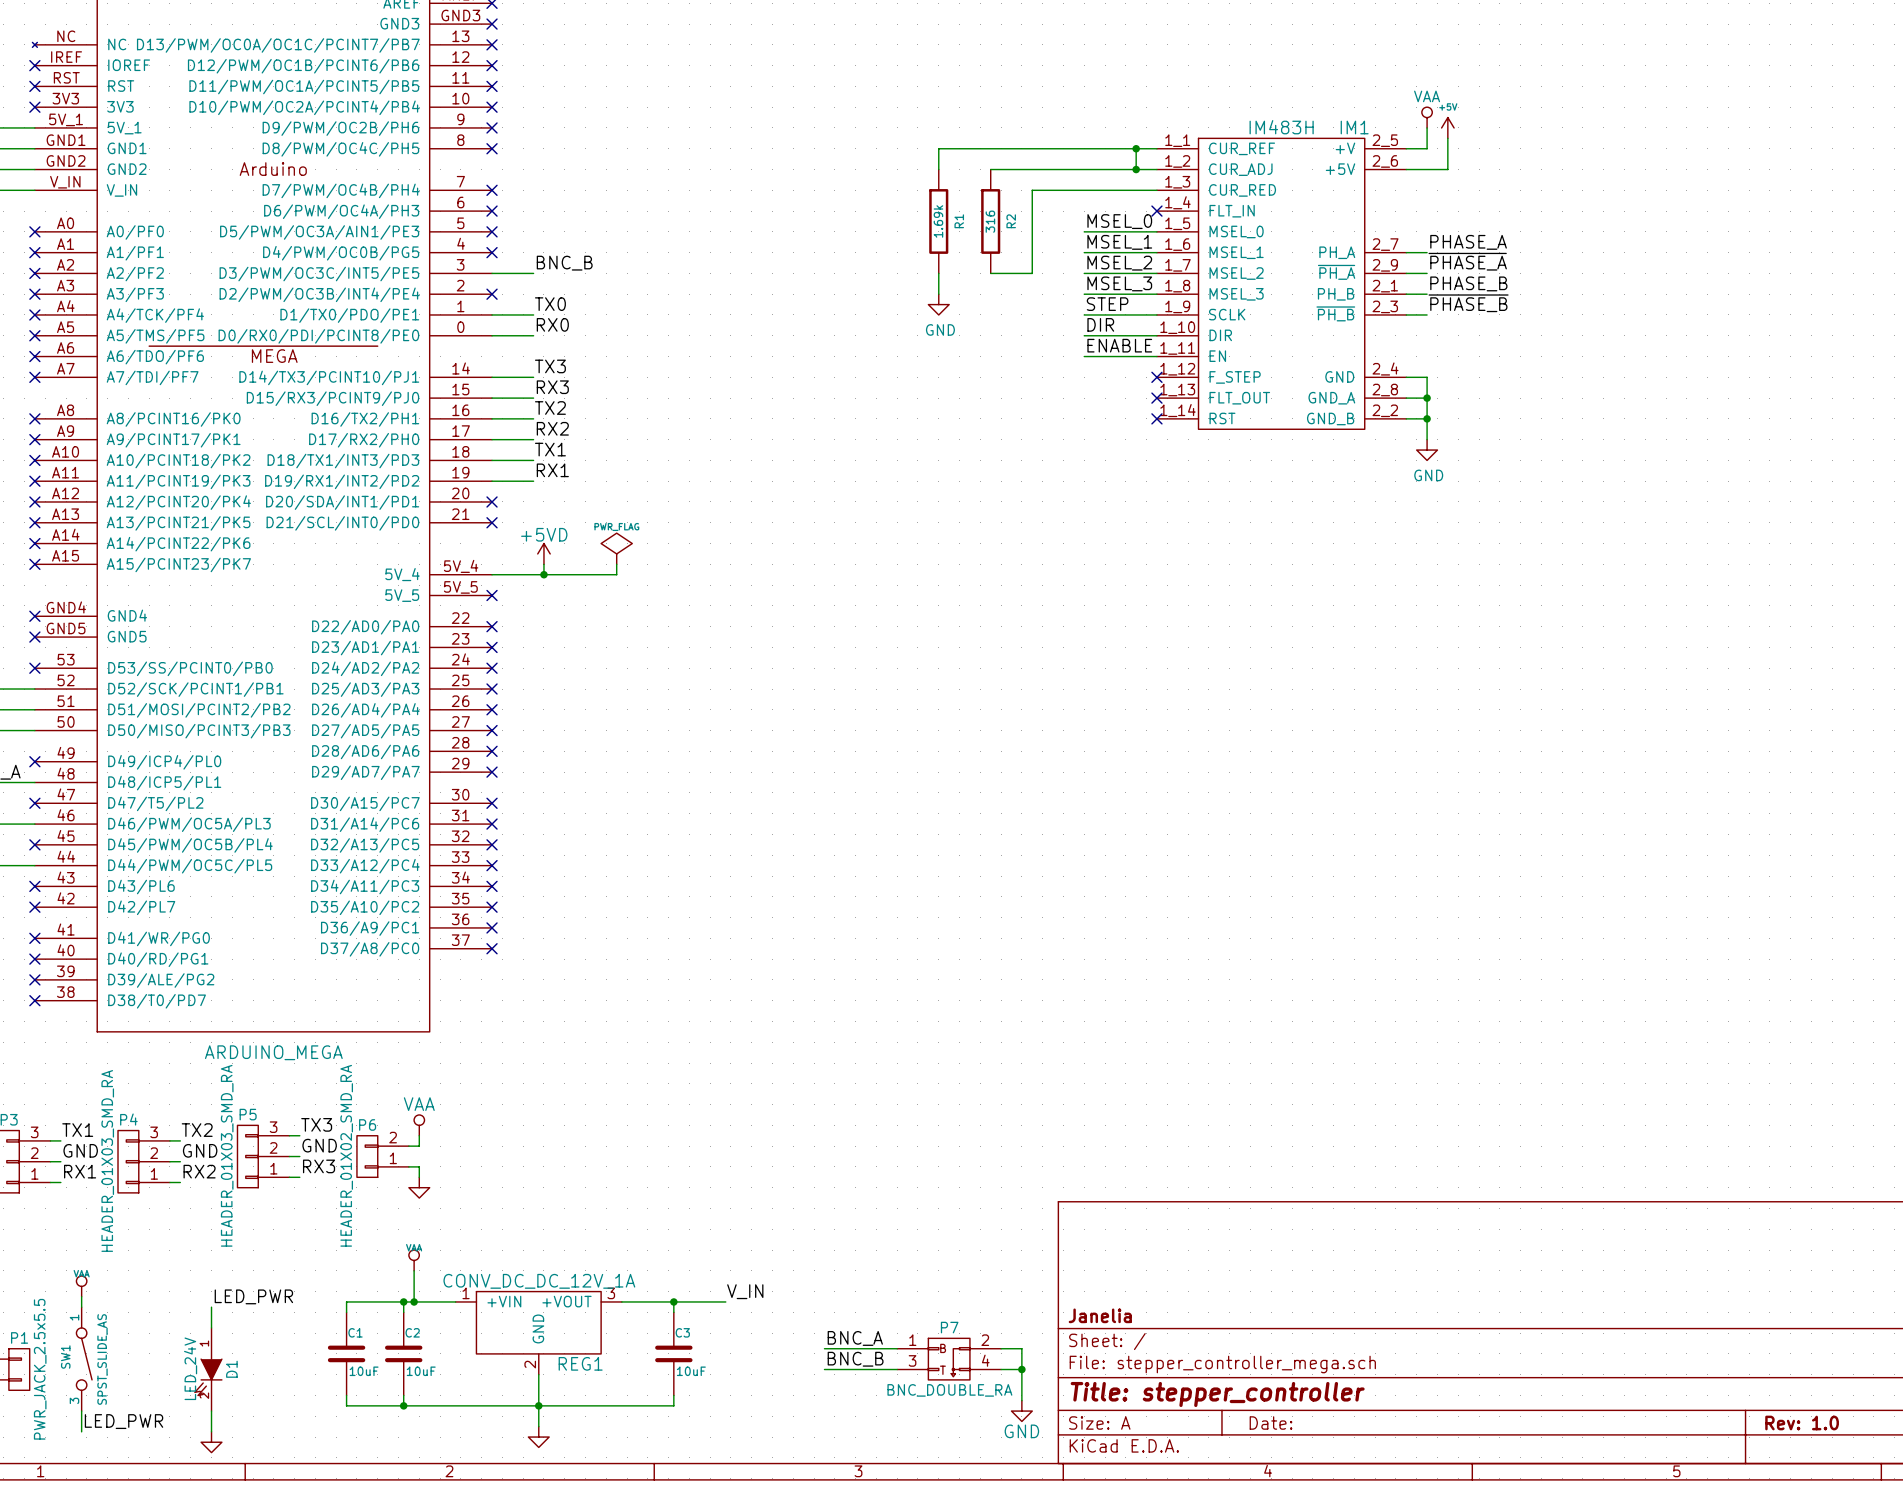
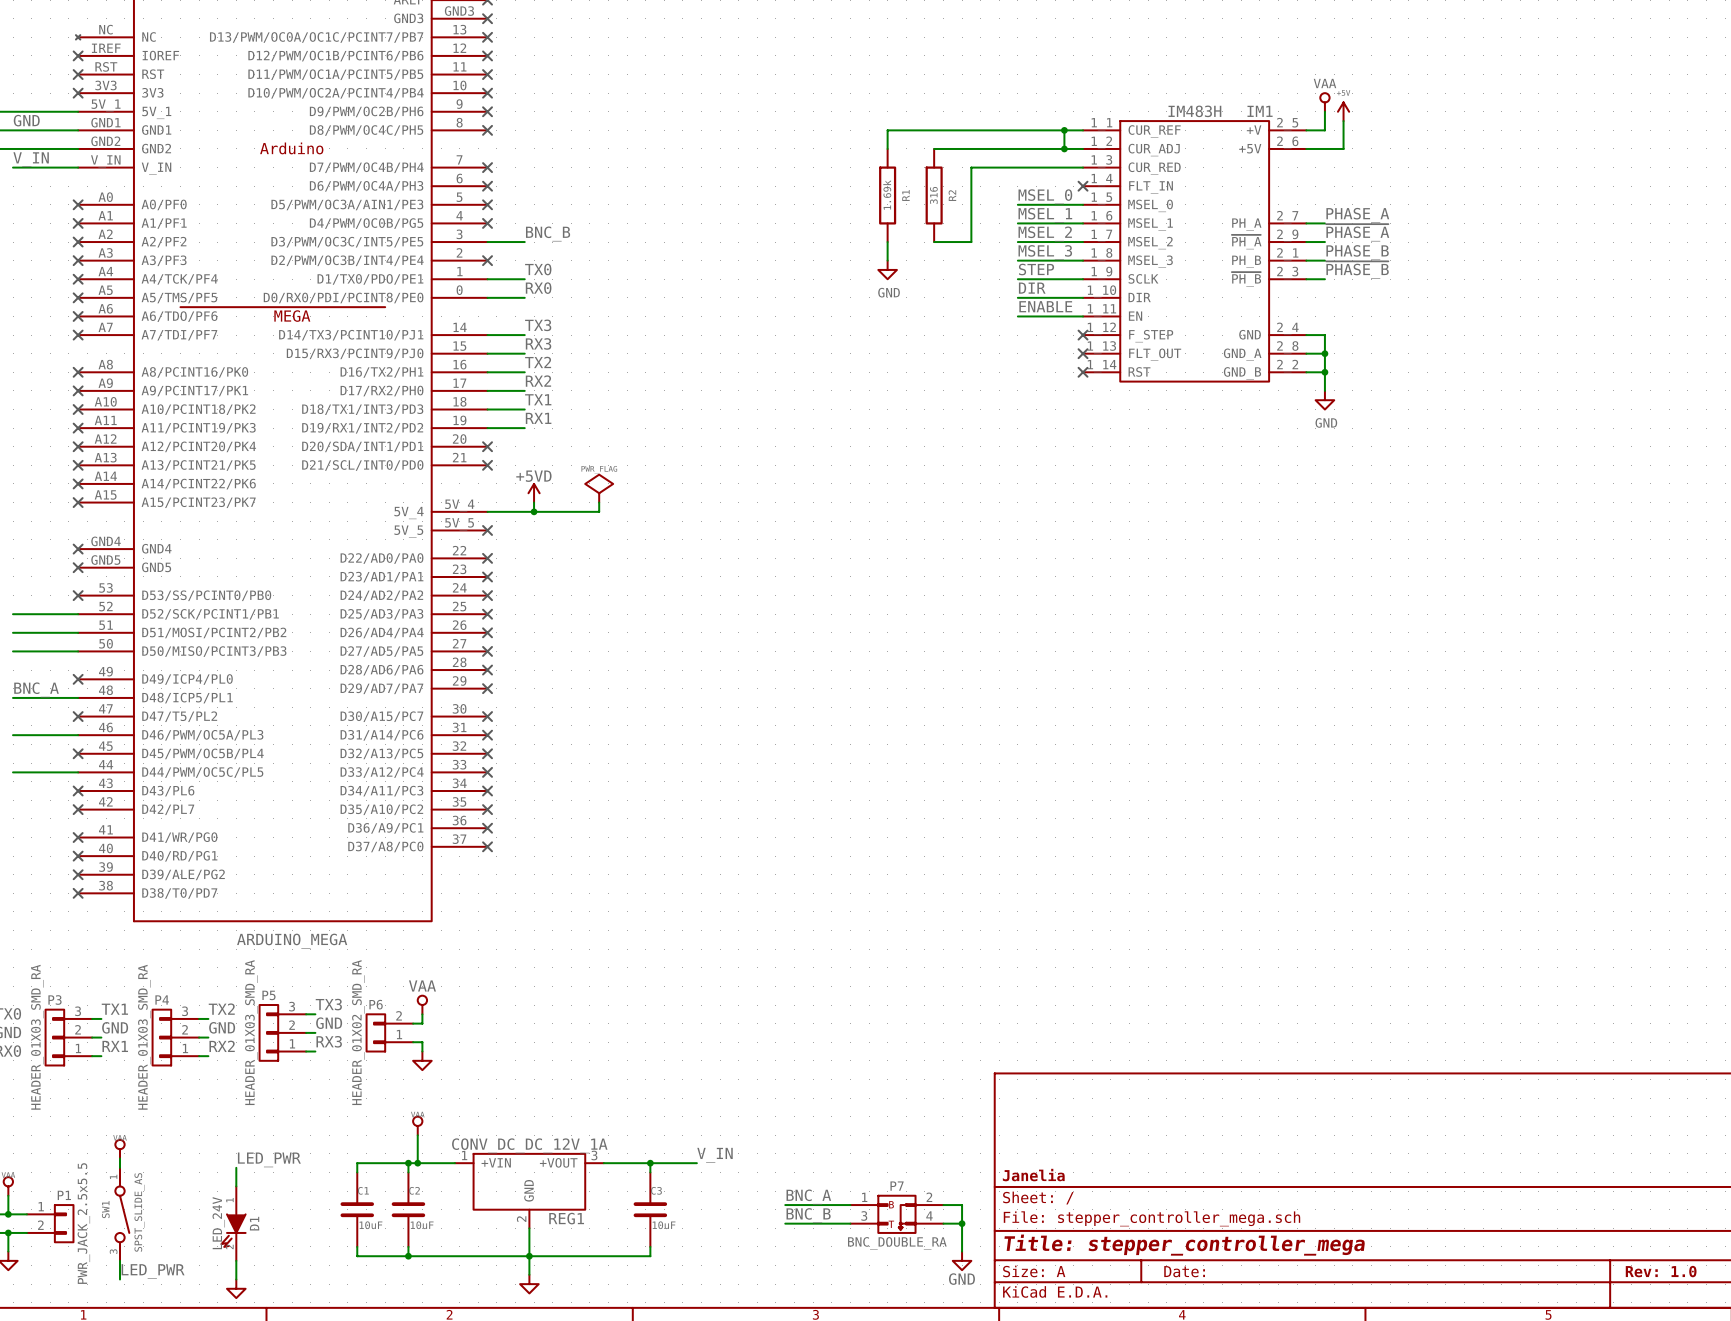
title block: Title: stepper_controller (1217, 1394) -> Title: stepper_controller_mega (1184, 1245)

